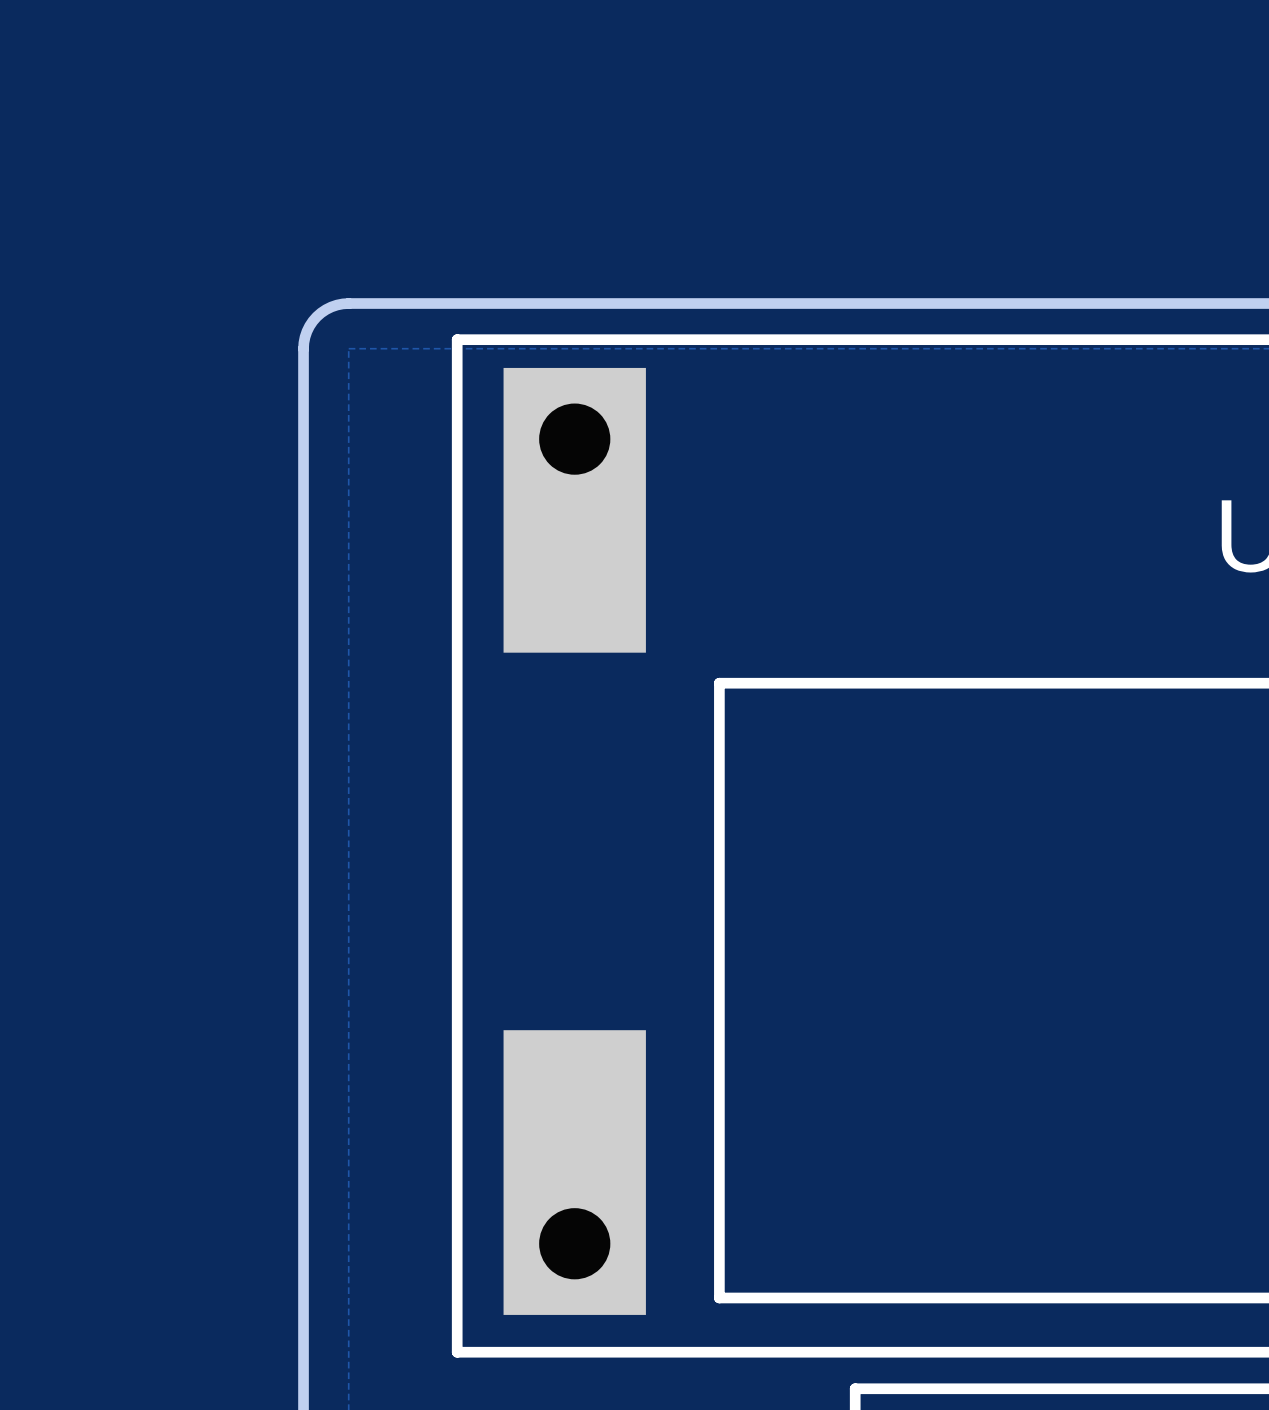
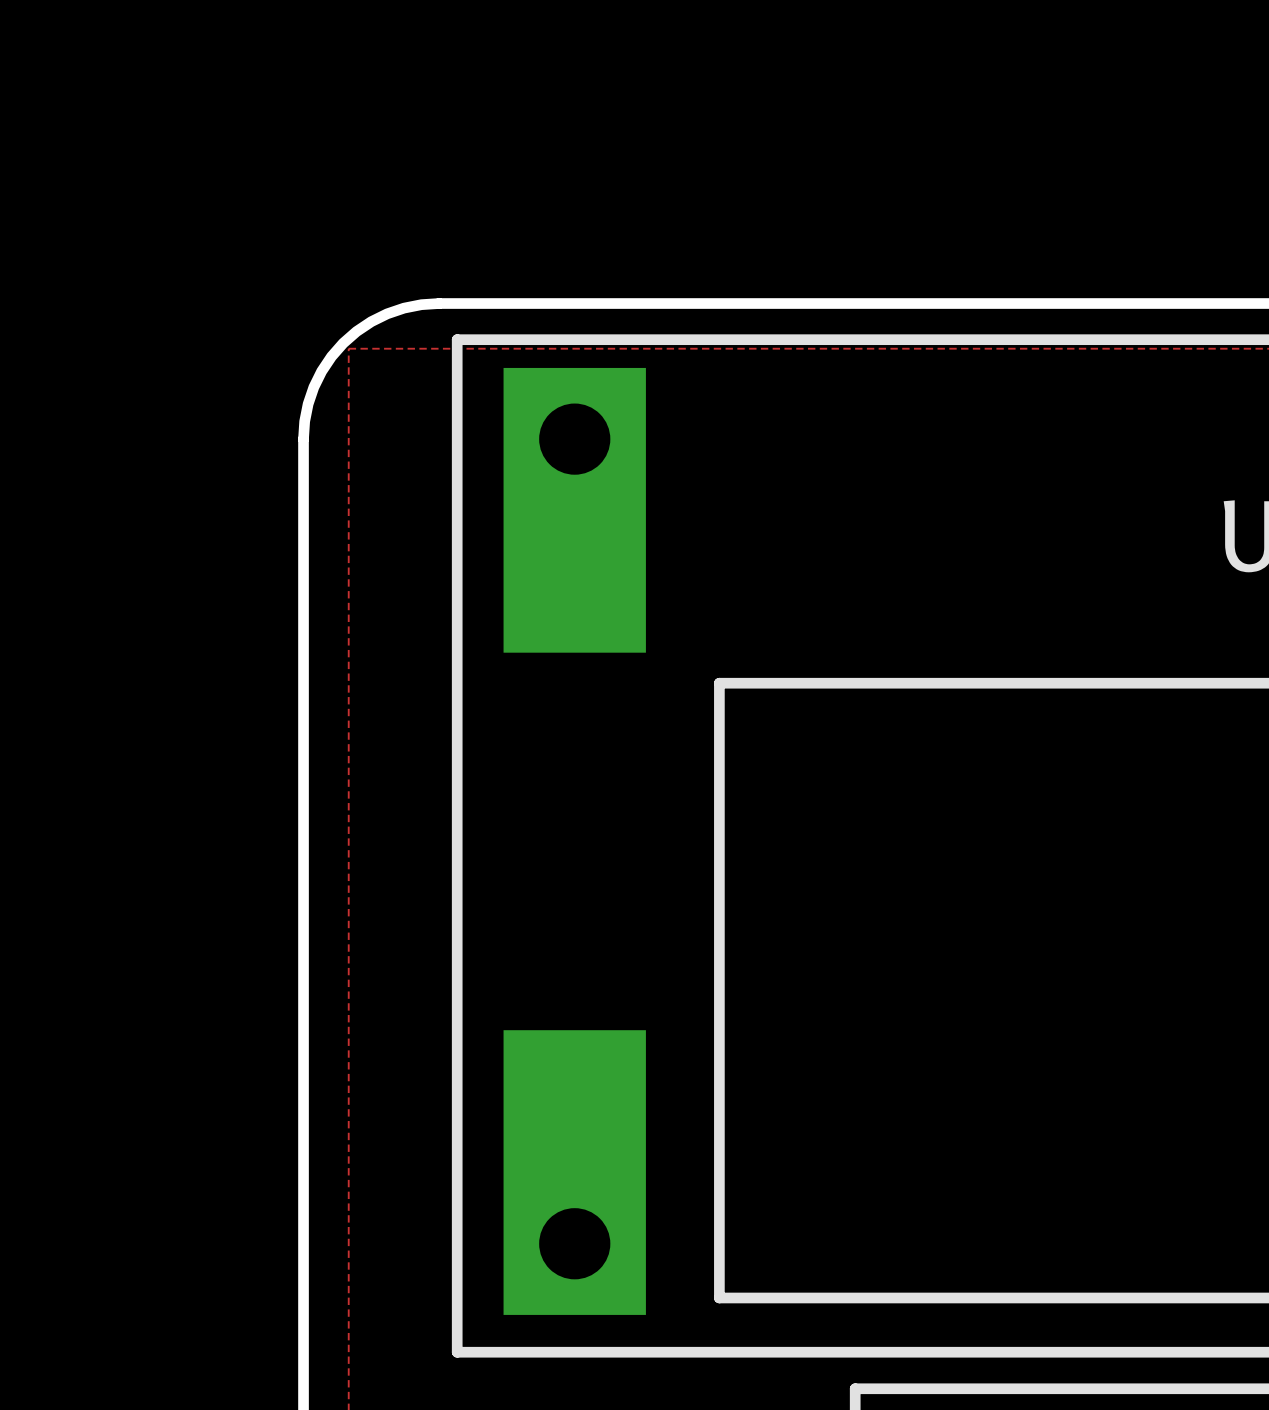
board edge: (439, 303) (342, 303) (326, 309) (316, 316) (306, 331) (303, 342) (303, 439) -> (439, 303) (421, 304) (387, 313) (371, 321) (343, 343) (321, 371) (313, 387) (304, 421) (303, 439)

